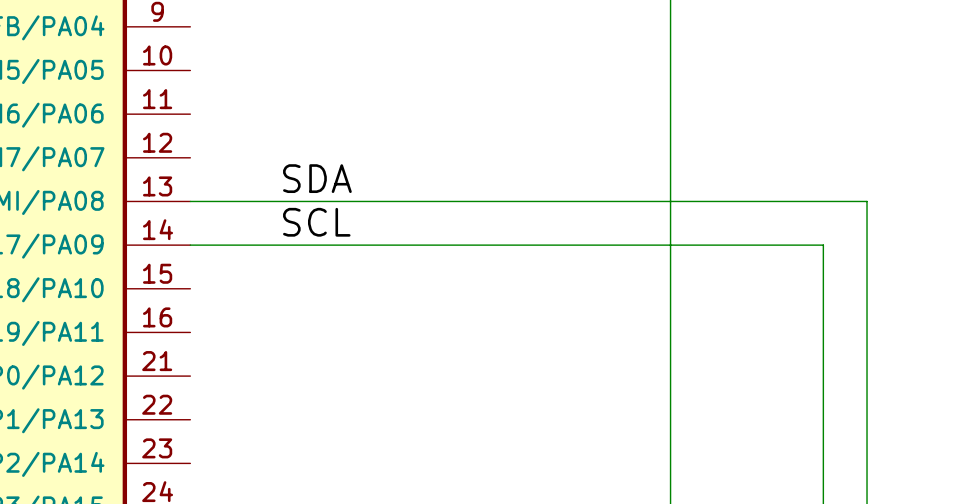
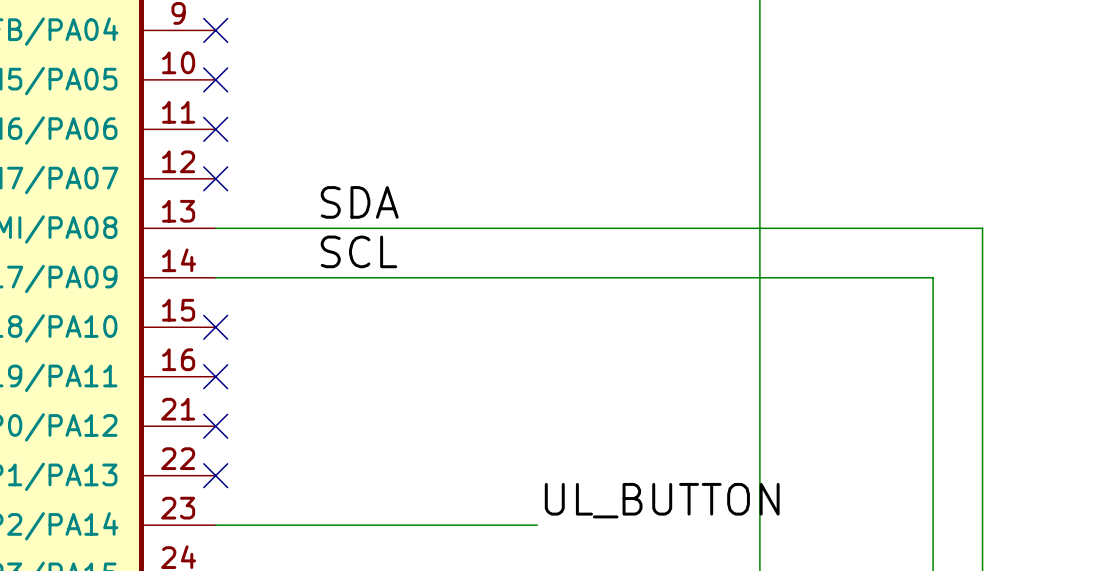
no-connect mark: none -> (215, 30)
no-connect mark: none -> (215, 79)
no-connect mark: none -> (215, 129)
no-connect mark: none -> (215, 178)
no-connect mark: none -> (215, 327)
no-connect mark: none -> (215, 376)
no-connect mark: none -> (215, 426)
no-connect mark: none -> (215, 475)
label: none -> UL_BUTTON (662, 500)
wire: none -> (215, 525) (537, 525)

